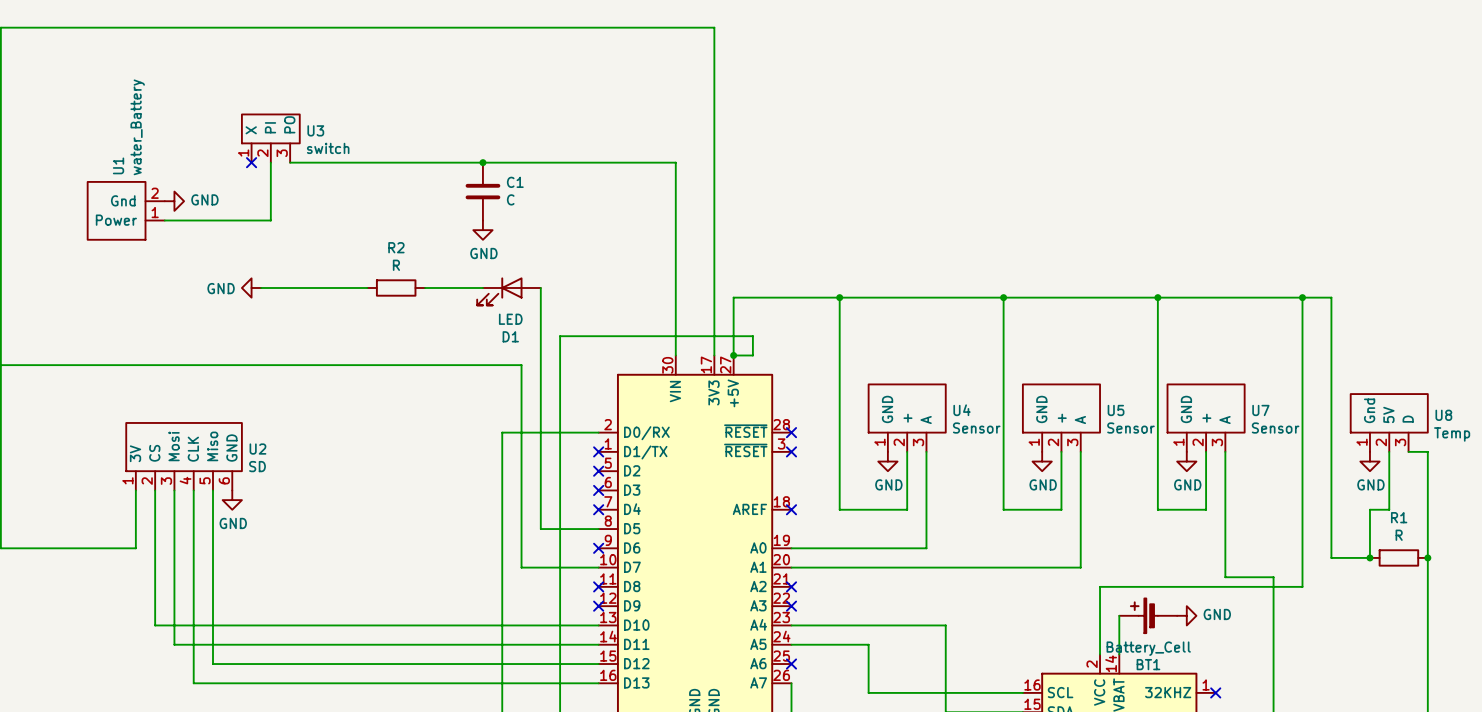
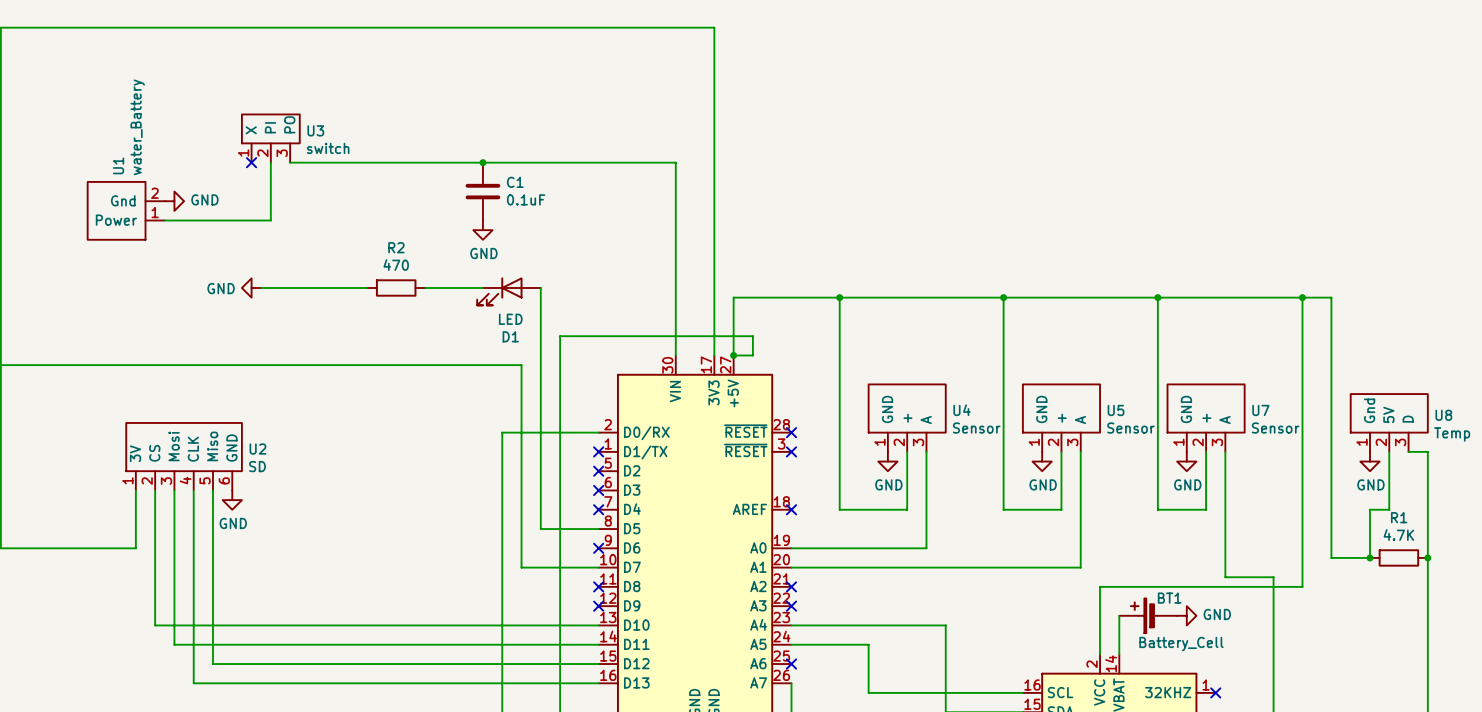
C1 value: C (510, 199) -> 0.1uF (526, 199)
R2 value: R (396, 265) -> 470 (396, 265)
R1 value: R (1399, 535) -> 4.7K (1398, 535)
BT1 value position: Battery_Cell (1148, 648) -> Battery_Cell (1181, 644)
BT1 name position: BT1 (1148, 664) -> BT1 (1169, 598)

